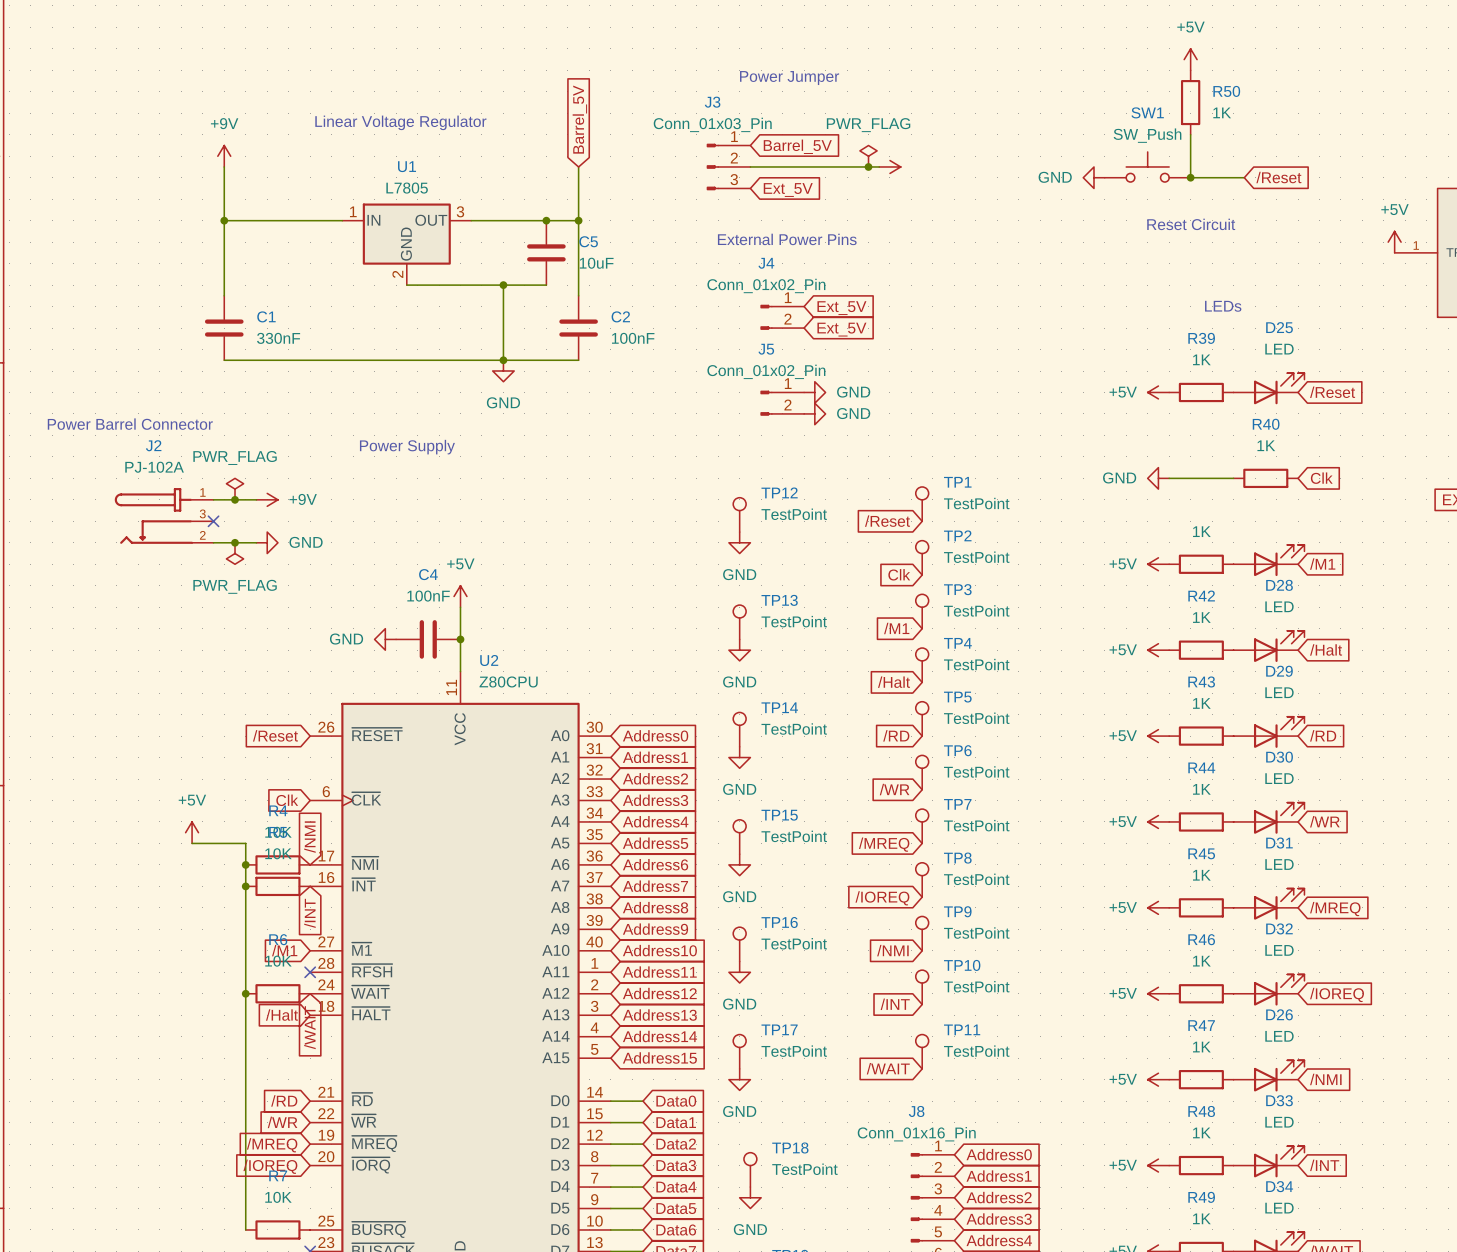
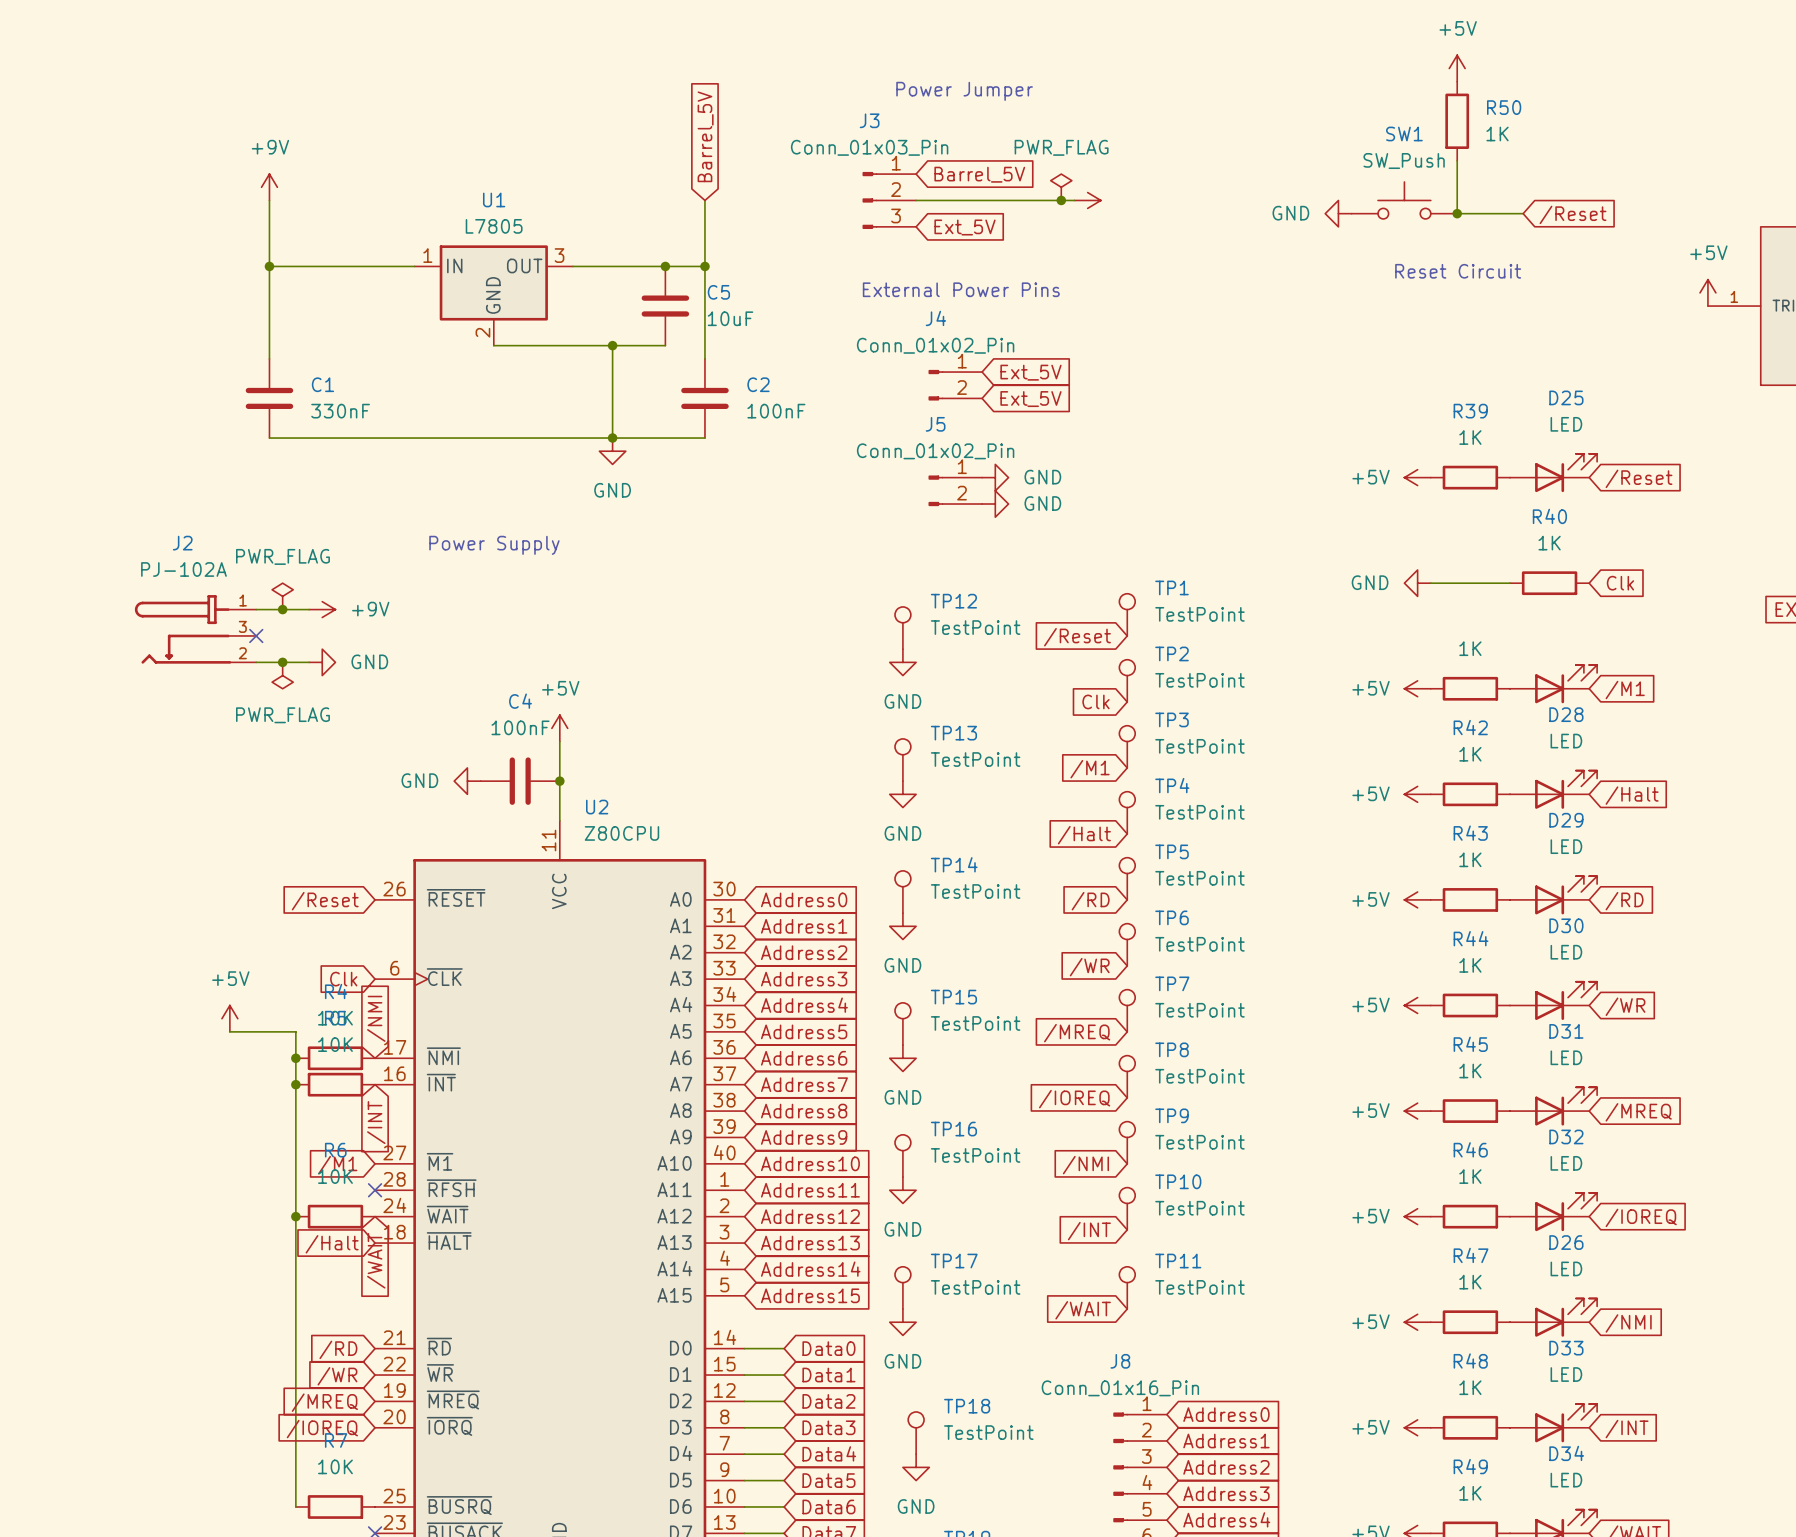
text: Linear Voltage Regulator (400, 122) -> none
text: LEDs (1223, 306) -> none
text: Power Barrel Connector (130, 424) -> none

